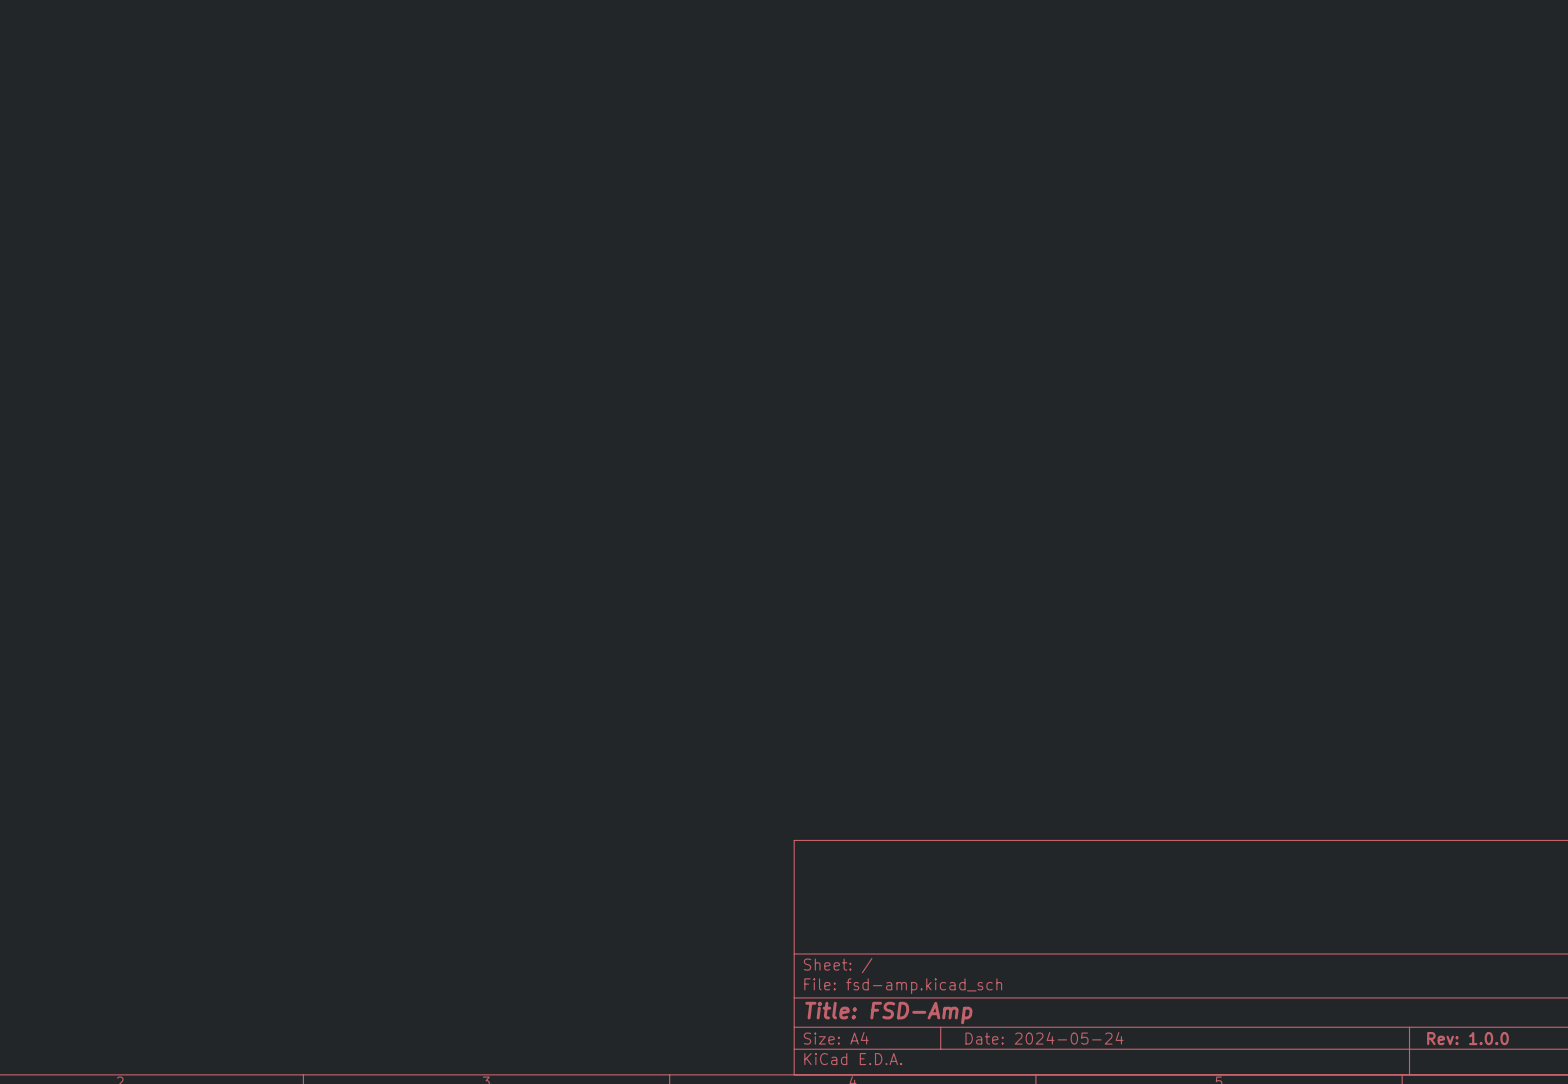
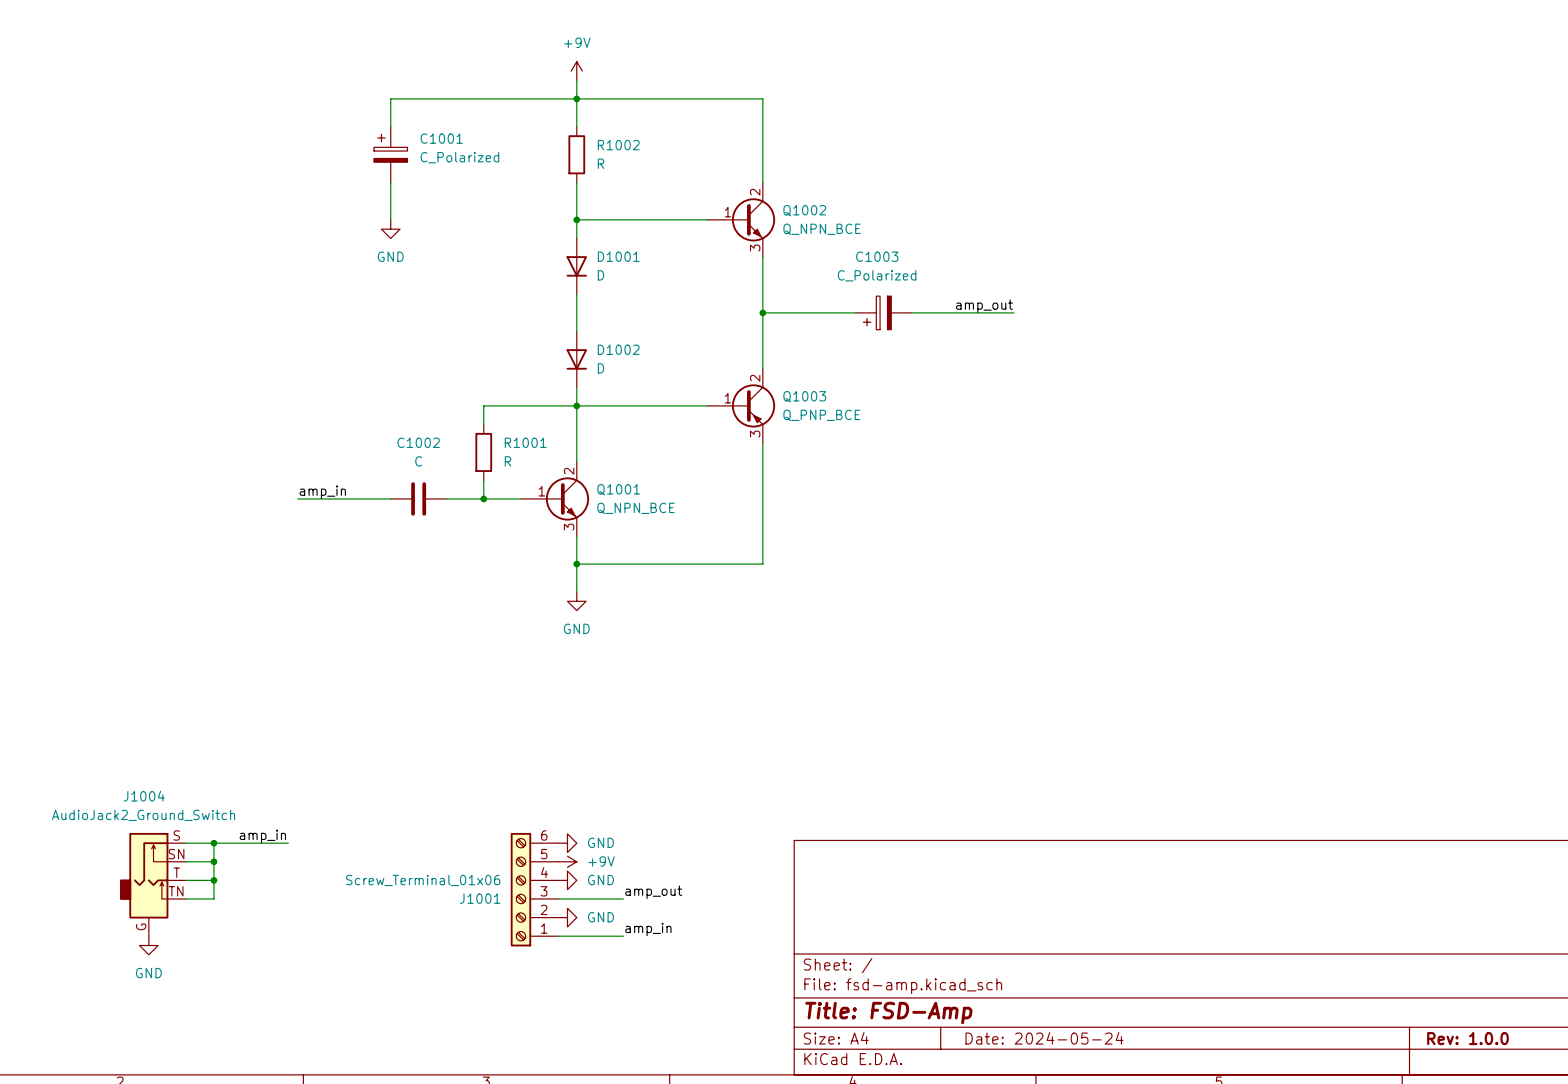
power symbol: none -> +9V (576, 71)
wire: none -> (576, 80) (576, 126)
junction: none -> (576, 98)
wire: none -> (390, 126) (390, 98) (762, 98) (762, 182)
C1001: none -> C_Polarized (390, 154)
R1002: none -> R (576, 154)
wire: none -> (390, 182) (390, 219)
wire: none -> (576, 182) (576, 238)
wire: none -> (576, 219) (707, 219)
junction: none -> (576, 219)
Q1002: none -> Q_NPN_BCE (741, 219)
power symbol: none -> GND (390, 229)
wire: none -> (762, 257) (762, 368)
D1001: none -> D (576, 266)
wire: none -> (576, 294) (576, 331)
label: none -> amp_out (984, 306)
wire: none -> (762, 312) (855, 312)
junction: none -> (762, 312)
C1003: none -> C_Polarized (883, 312)
wire: none -> (911, 312) (1014, 312)
D1002: none -> D (576, 359)
wire: none -> (576, 387) (576, 461)
junction: none -> (576, 405)
wire: none -> (707, 405) (483, 405) (483, 424)
Q1003: none -> Q_PNP_BCE (741, 405)
wire: none -> (762, 443) (762, 564) (576, 564)
R1001: none -> R (483, 452)
wire: none -> (483, 480) (483, 498)
label: none -> amp_in (322, 492)
wire: none -> (297, 498) (390, 498)
C1002: none -> C (418, 498)
wire: none -> (446, 498) (520, 498)
junction: none -> (483, 498)
Q1001: none -> Q_NPN_BCE (555, 498)
wire: none -> (576, 536) (576, 591)
junction: none -> (576, 564)
power symbol: none -> GND (576, 601)
label: none -> amp_in (262, 836)
wire: none -> (186, 843) (288, 843)
wire: none -> (213, 843) (213, 898) (186, 898)
junction: none -> (213, 843)
power symbol: none -> GND (567, 843)
wire: none -> (186, 861) (213, 861)
junction: none -> (213, 861)
power symbol: none -> +9V (567, 861)
wire: none -> (186, 880) (213, 880)
junction: none -> (213, 880)
power symbol: none -> GND (567, 880)
J1004: none -> AudioJack2_Ground_Switch (153, 884)
J1001: none -> Screw_Terminal_01x06 (534, 889)
label: none -> amp_out (653, 892)
wire: none -> (558, 898) (623, 898)
power symbol: none -> GND (567, 917)
label: none -> amp_in (648, 929)
wire: none -> (558, 936) (623, 936)
power symbol: none -> GND (148, 945)

